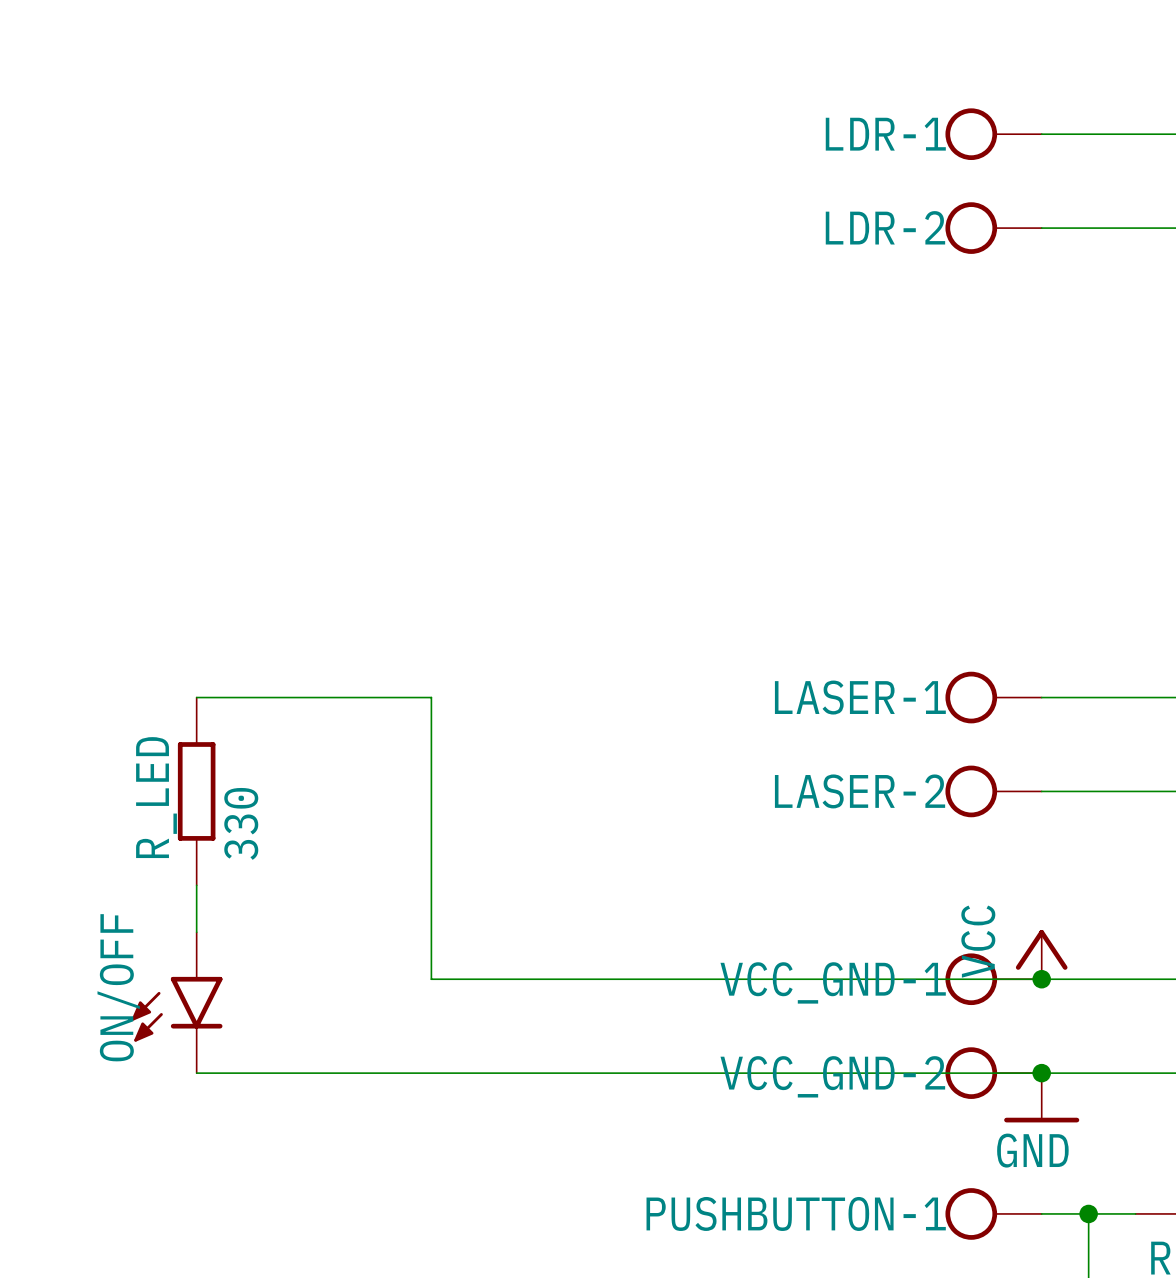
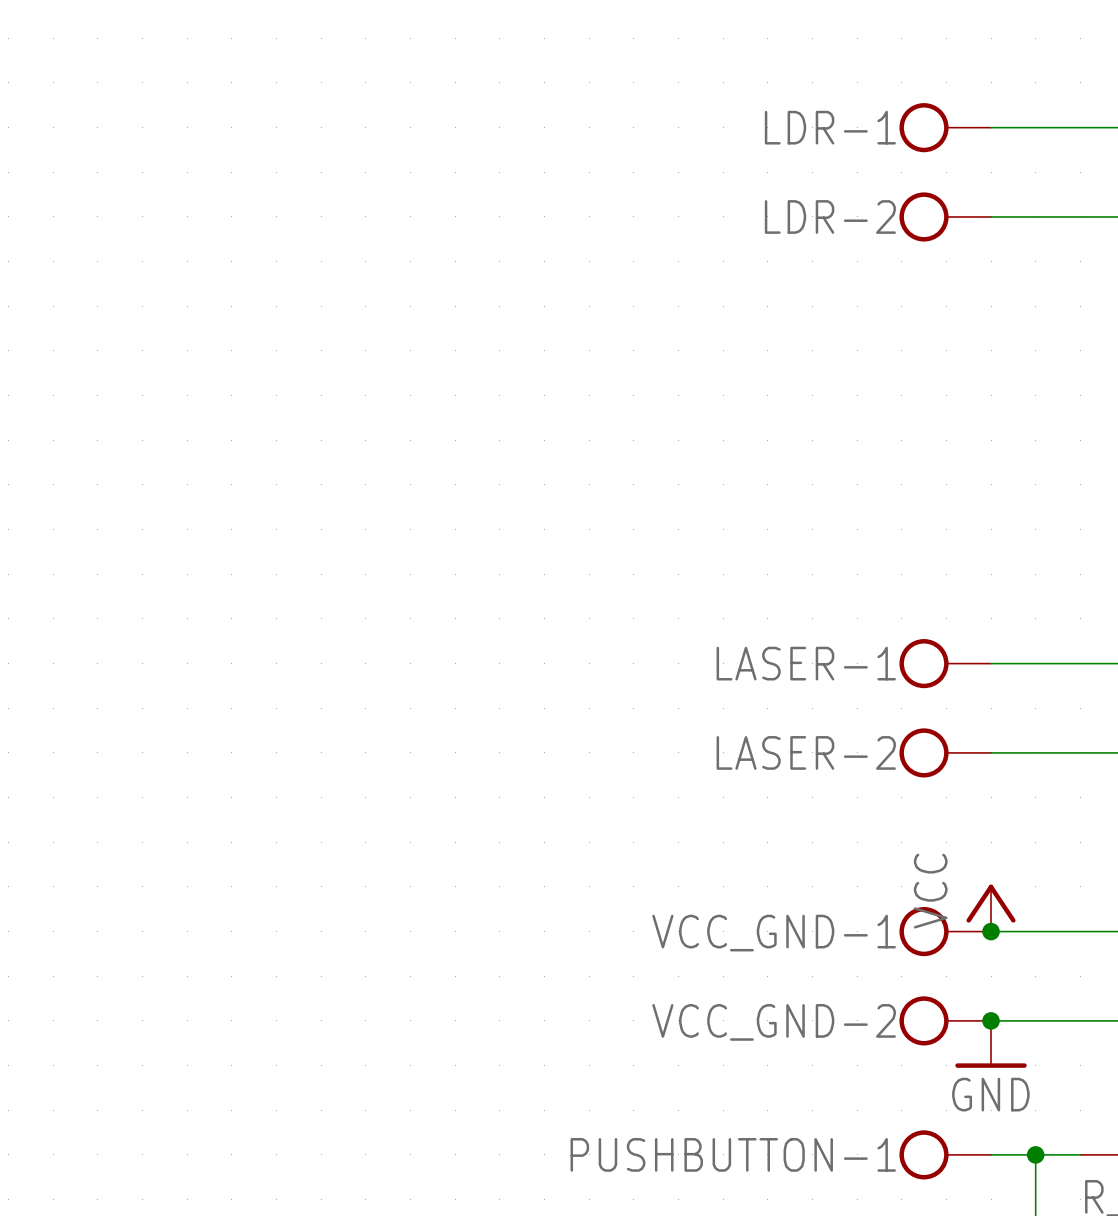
wire: (196, 697) (431, 697) (431, 979) (1041, 979) -> none
R_LED: 330 (196, 791) -> none
wire: (196, 885) (196, 932) -> none
ON/OFF: (177, 1002) -> none
wire: (196, 1073) (1041, 1073) -> none

